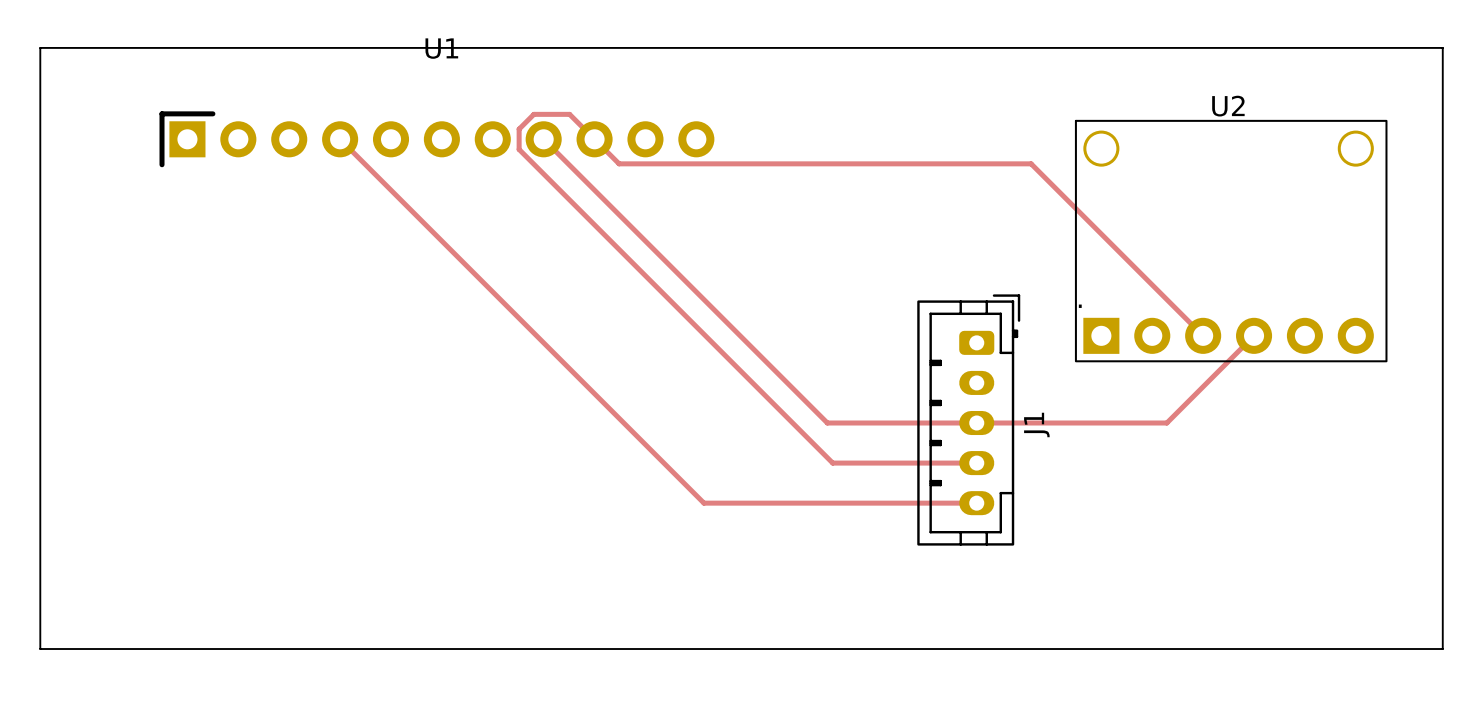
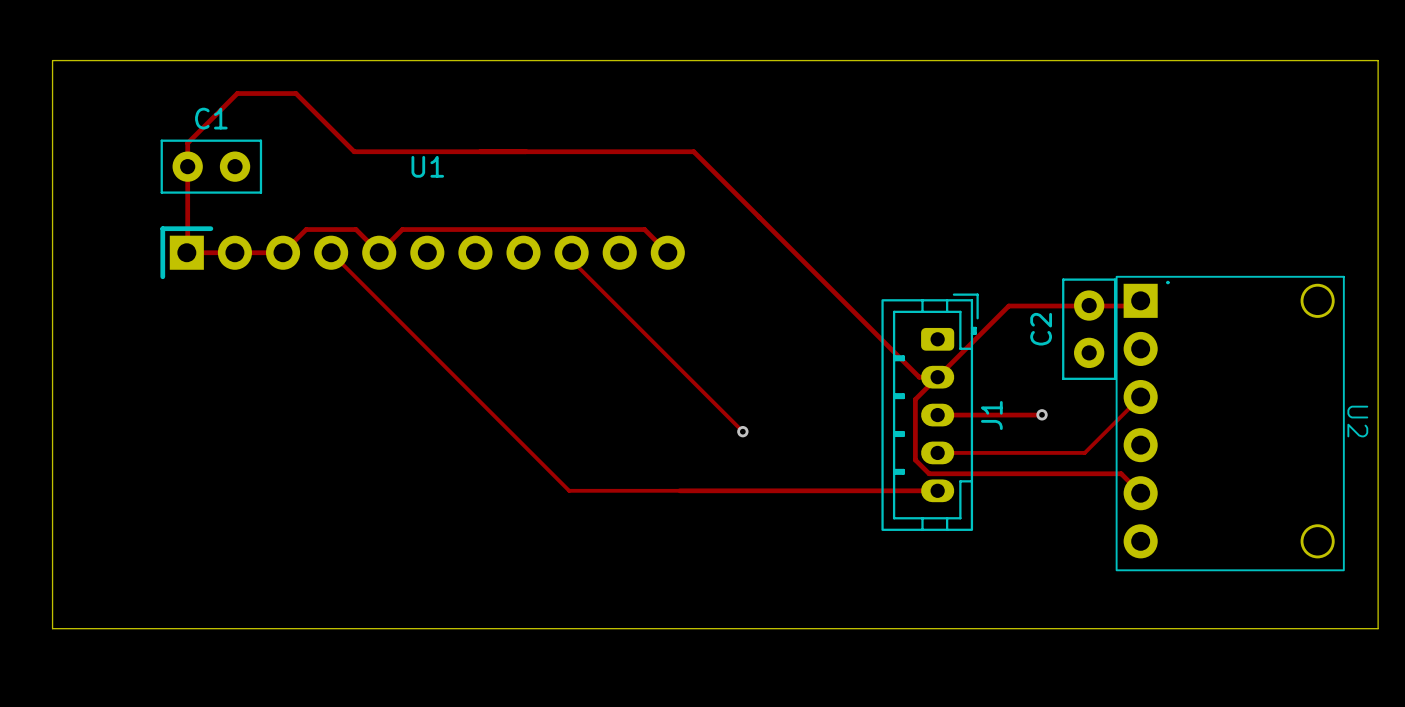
track: (340, 139) (703, 503) -> (331, 252) (569, 490) (679, 490)
U1 position: (436, 139) -> (422, 252)
track: (543, 139) (827, 423) (976, 423) -> none
C1: none -> (211, 166)
U2 rotation: 0° (1231, 241) -> 90° clockwise (1230, 423)
U2 position: (1231, 241) -> (1230, 423)
track: none -> (571, 252) (571, 260) (742, 431)
track: none -> (667, 252) (644, 229) (402, 229) (379, 252) (356, 229) (306, 229) (283, 252) (186, 252) (187, 143) (237, 93) (296, 93) (354, 151) (693, 151) (919, 377) (937, 377)
track: none -> (1140, 300) (1135, 306) (1008, 306) (915, 399) (915, 459) (929, 473) (1121, 473) (1140, 493)
C2: none -> (1089, 329)
track: (1203, 335) (1031, 163) (619, 163) (569, 114) (533, 114) (519, 129) (519, 149) (832, 463) (976, 463) -> (1140, 397) (1084, 452) (937, 452)
track: (1254, 335) (1166, 423) (1086, 423) -> none
via: none -> (1042, 414)
via: none -> (742, 431)

